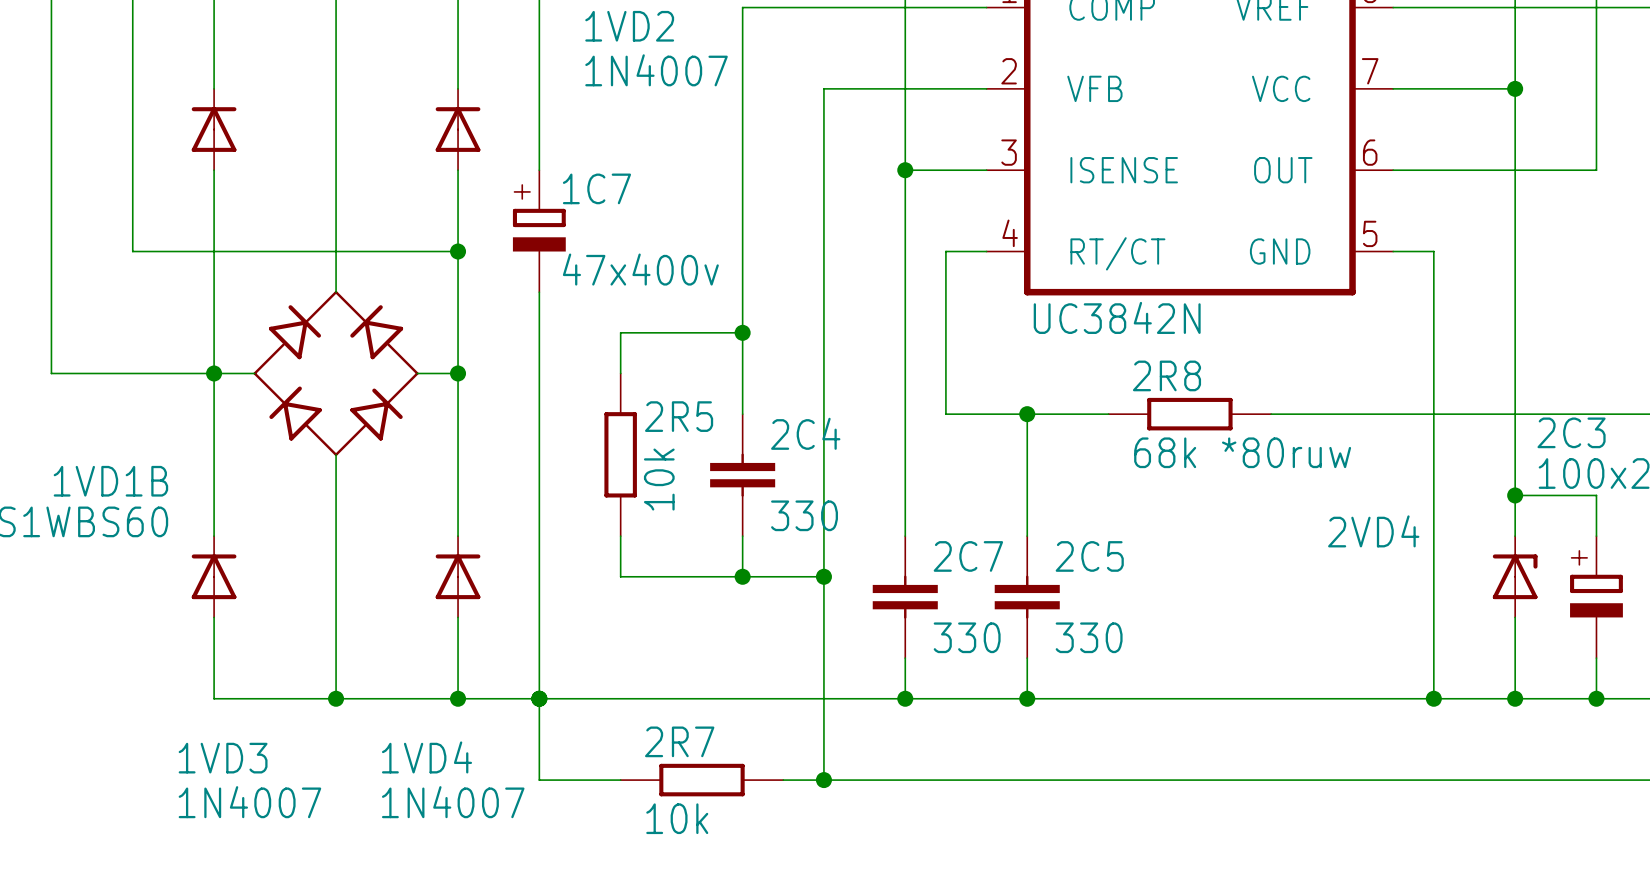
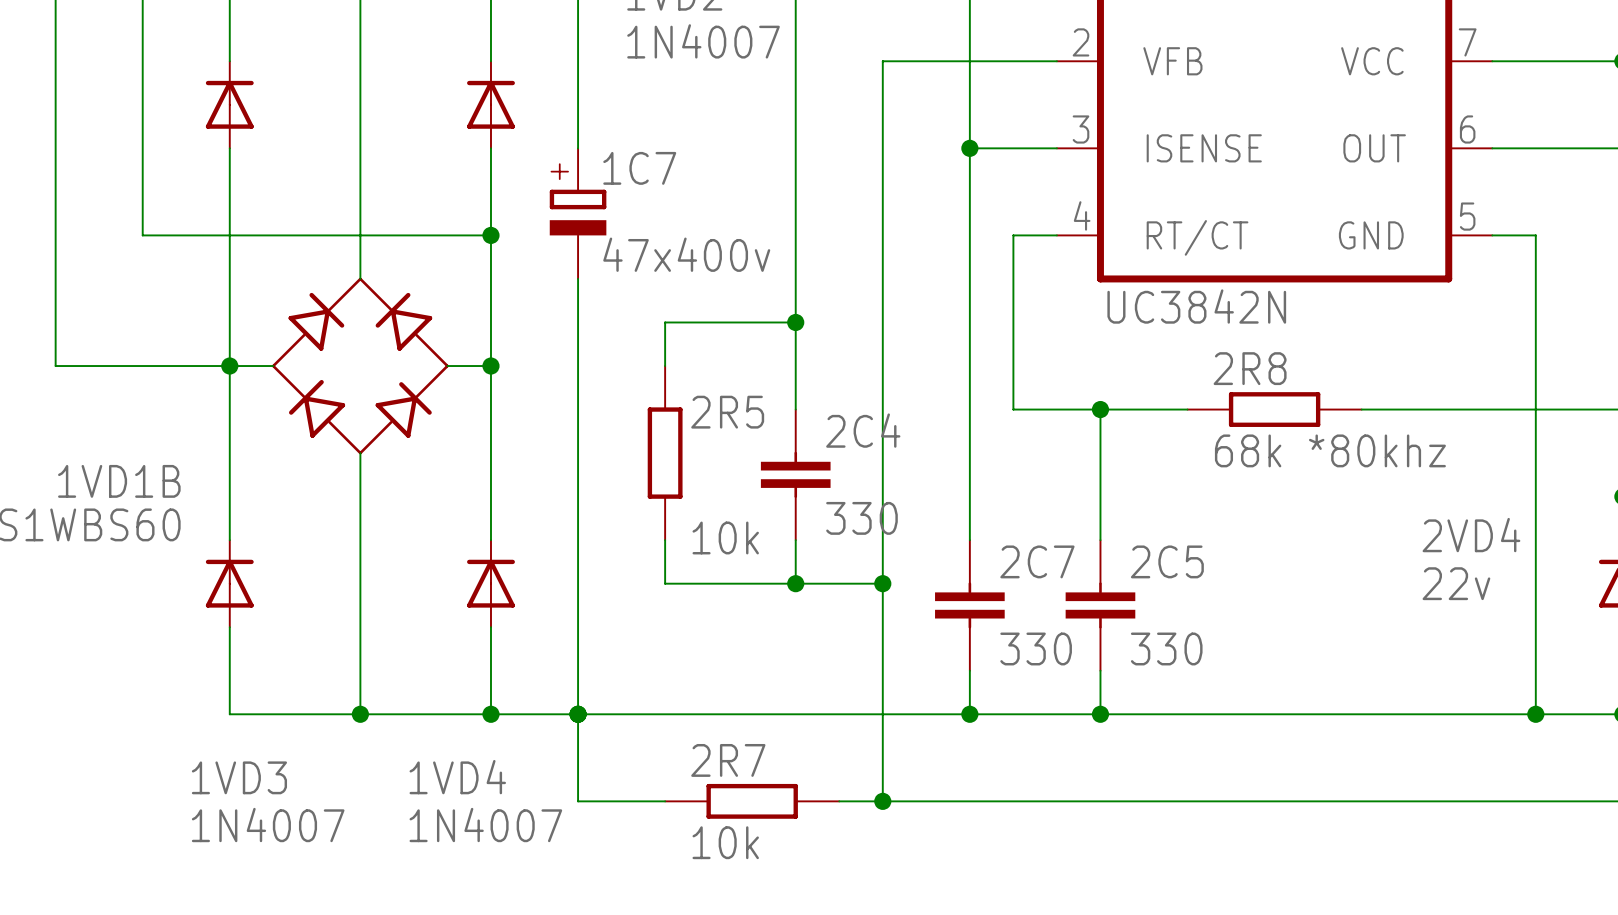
2R8 value: 68k *80ruw (1242, 452) -> 68k *80khz (1330, 450)
2R5 value rotation: 0° (659, 479) -> 90° clockwise (725, 537)
2VD4 value: none -> 22v (1456, 583)

